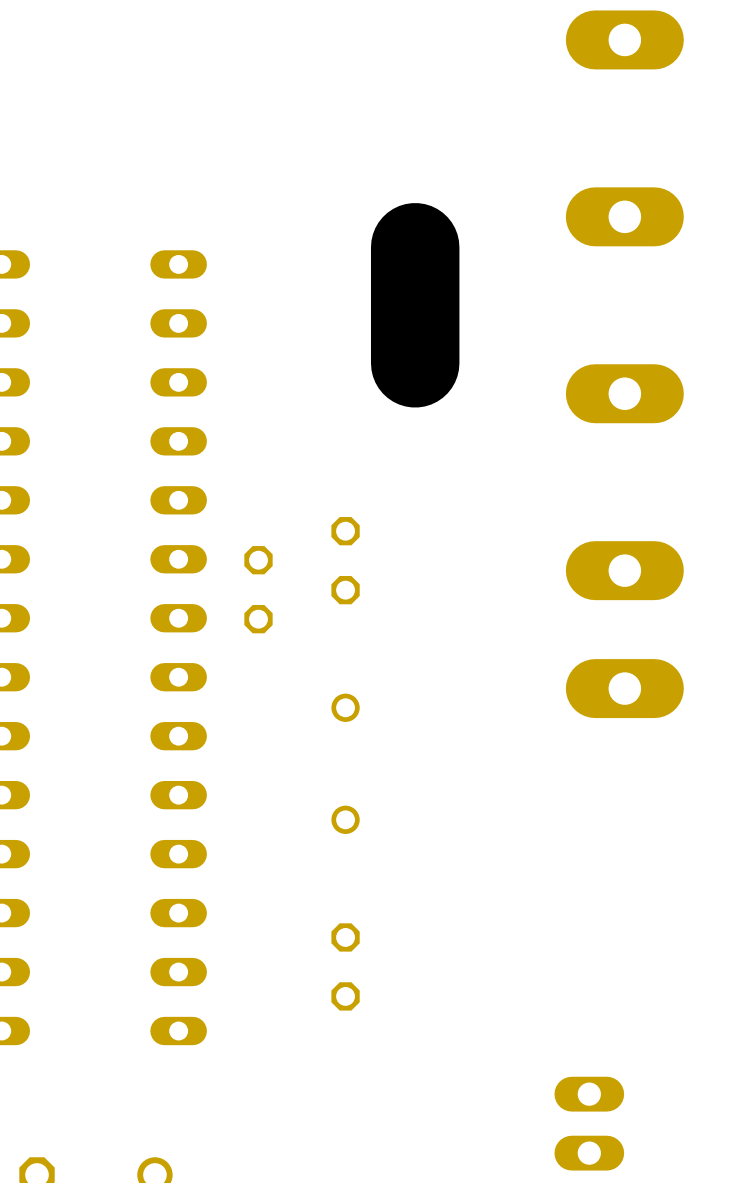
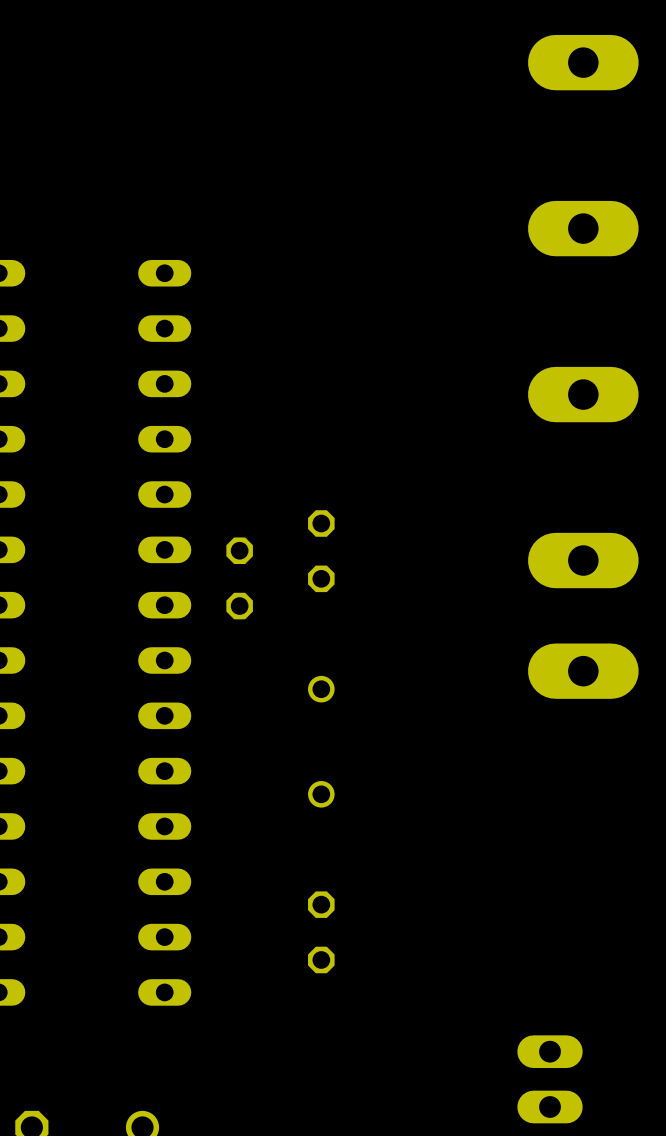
board edge: (415, 247) (415, 363) -> none

